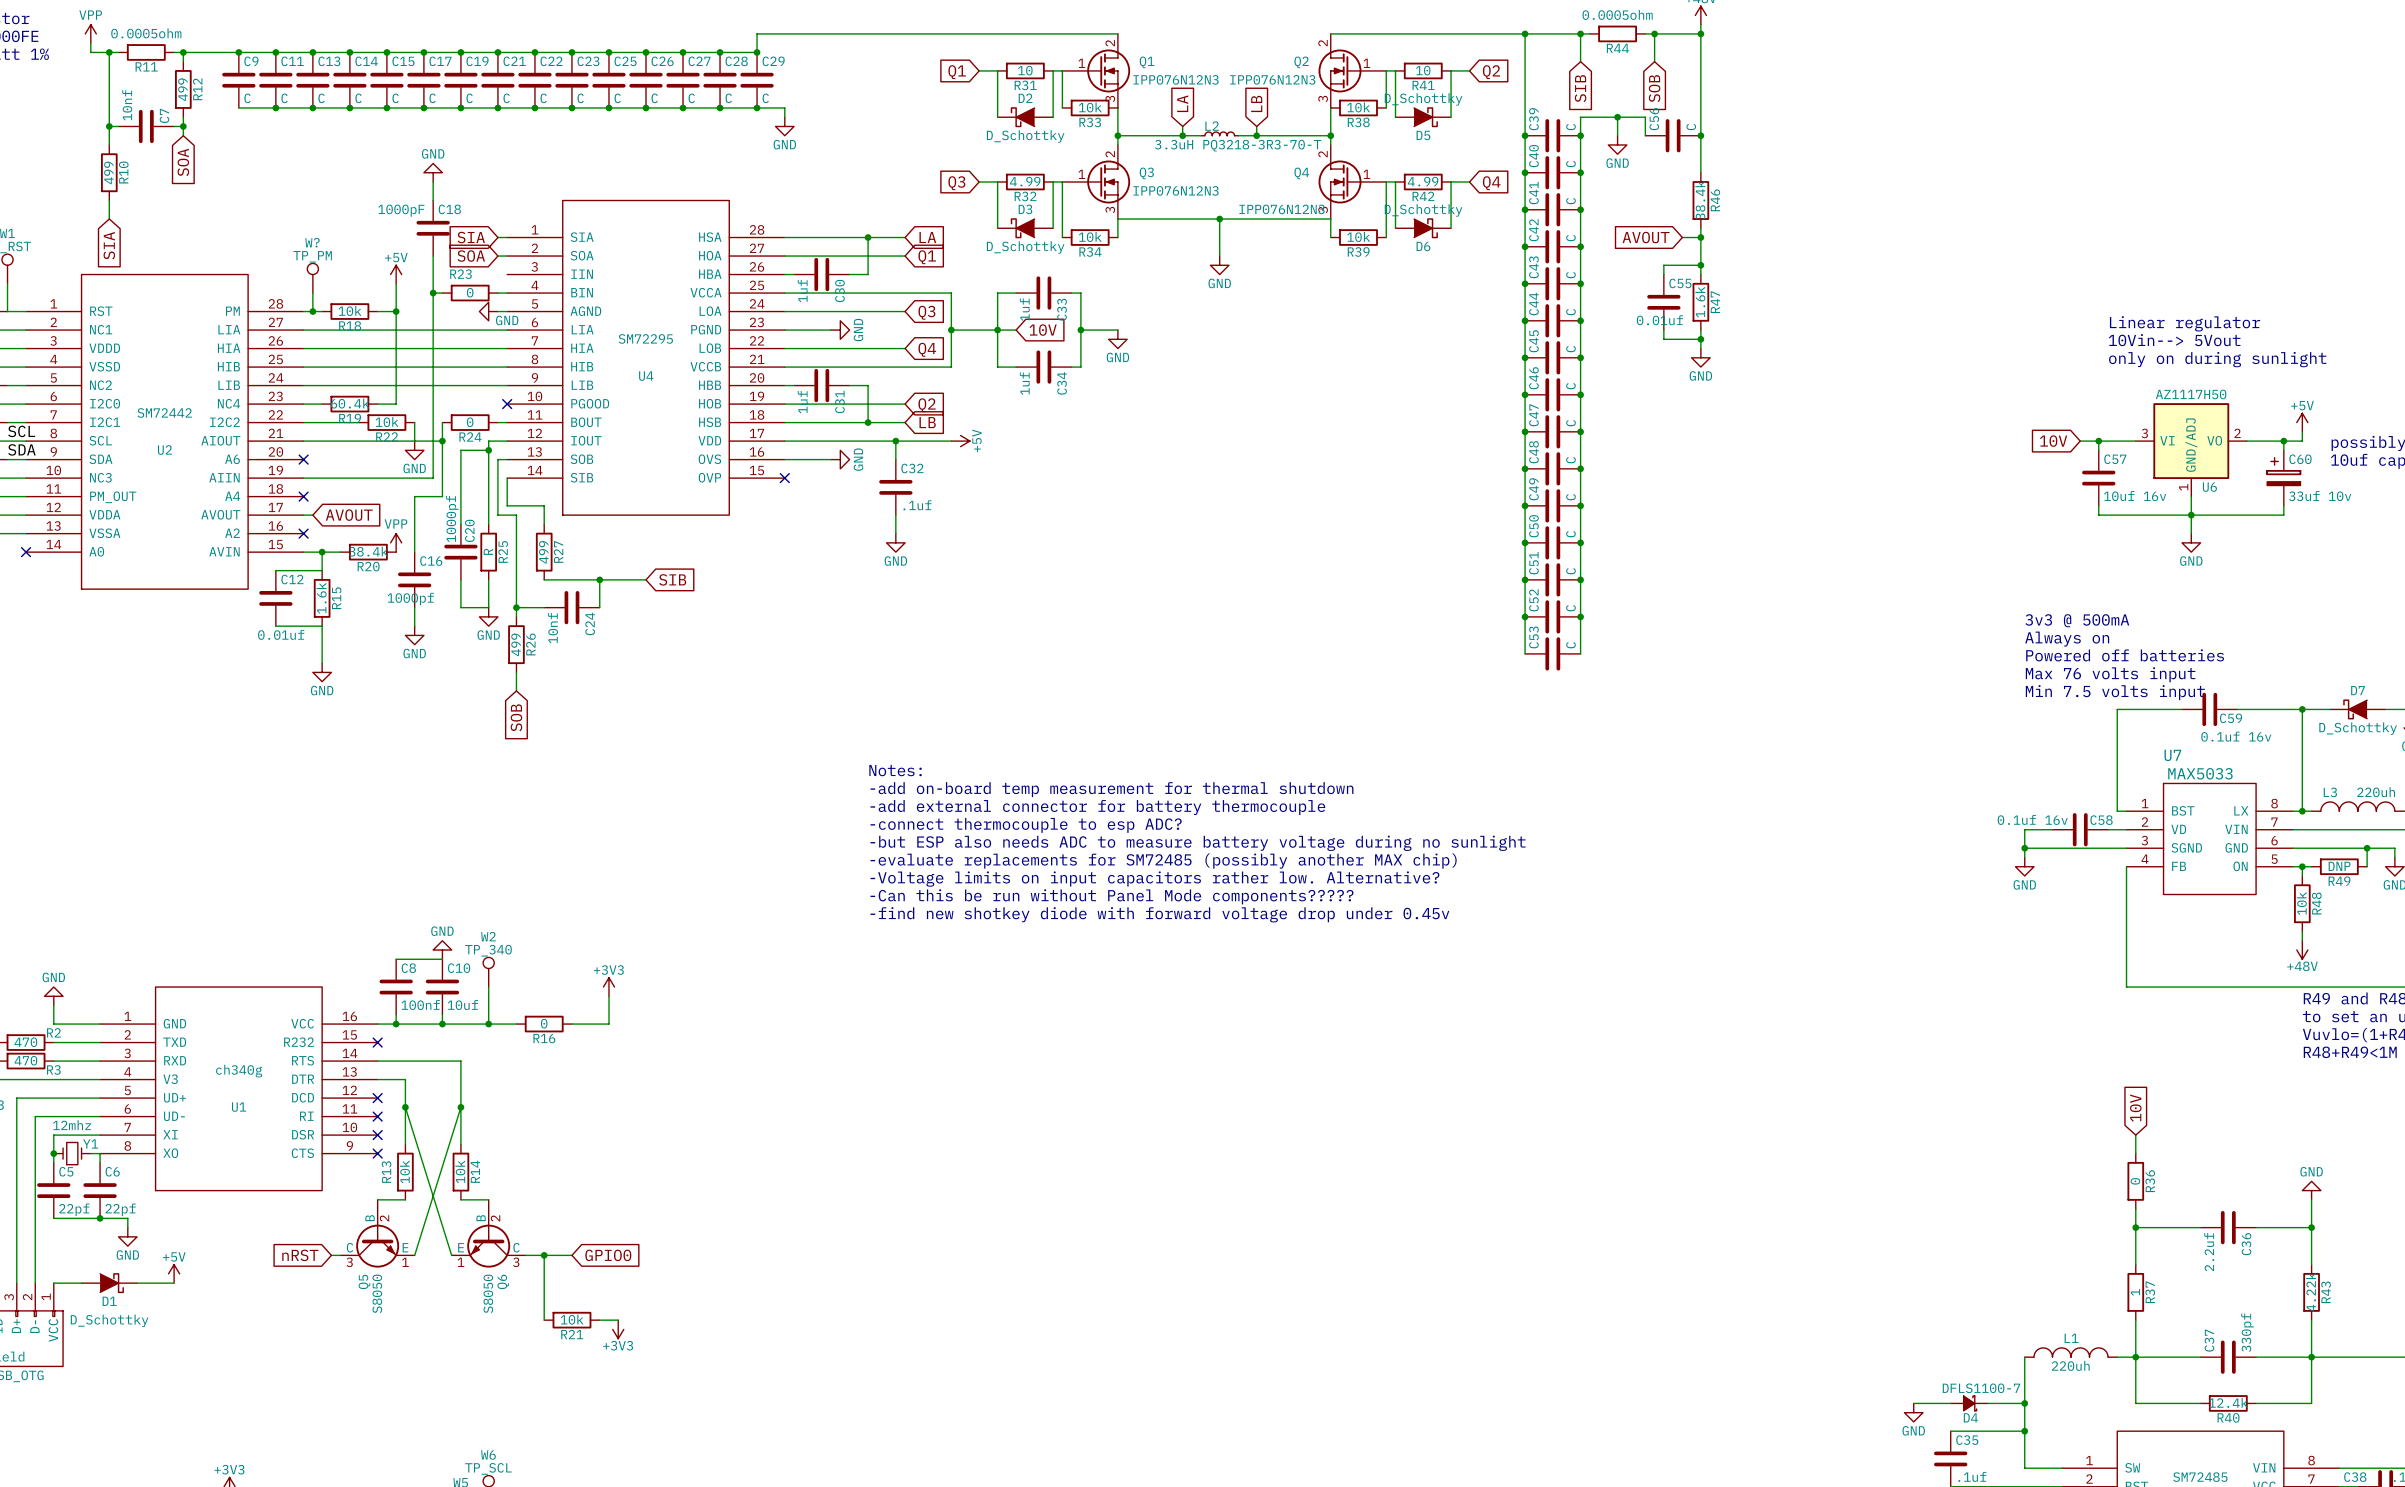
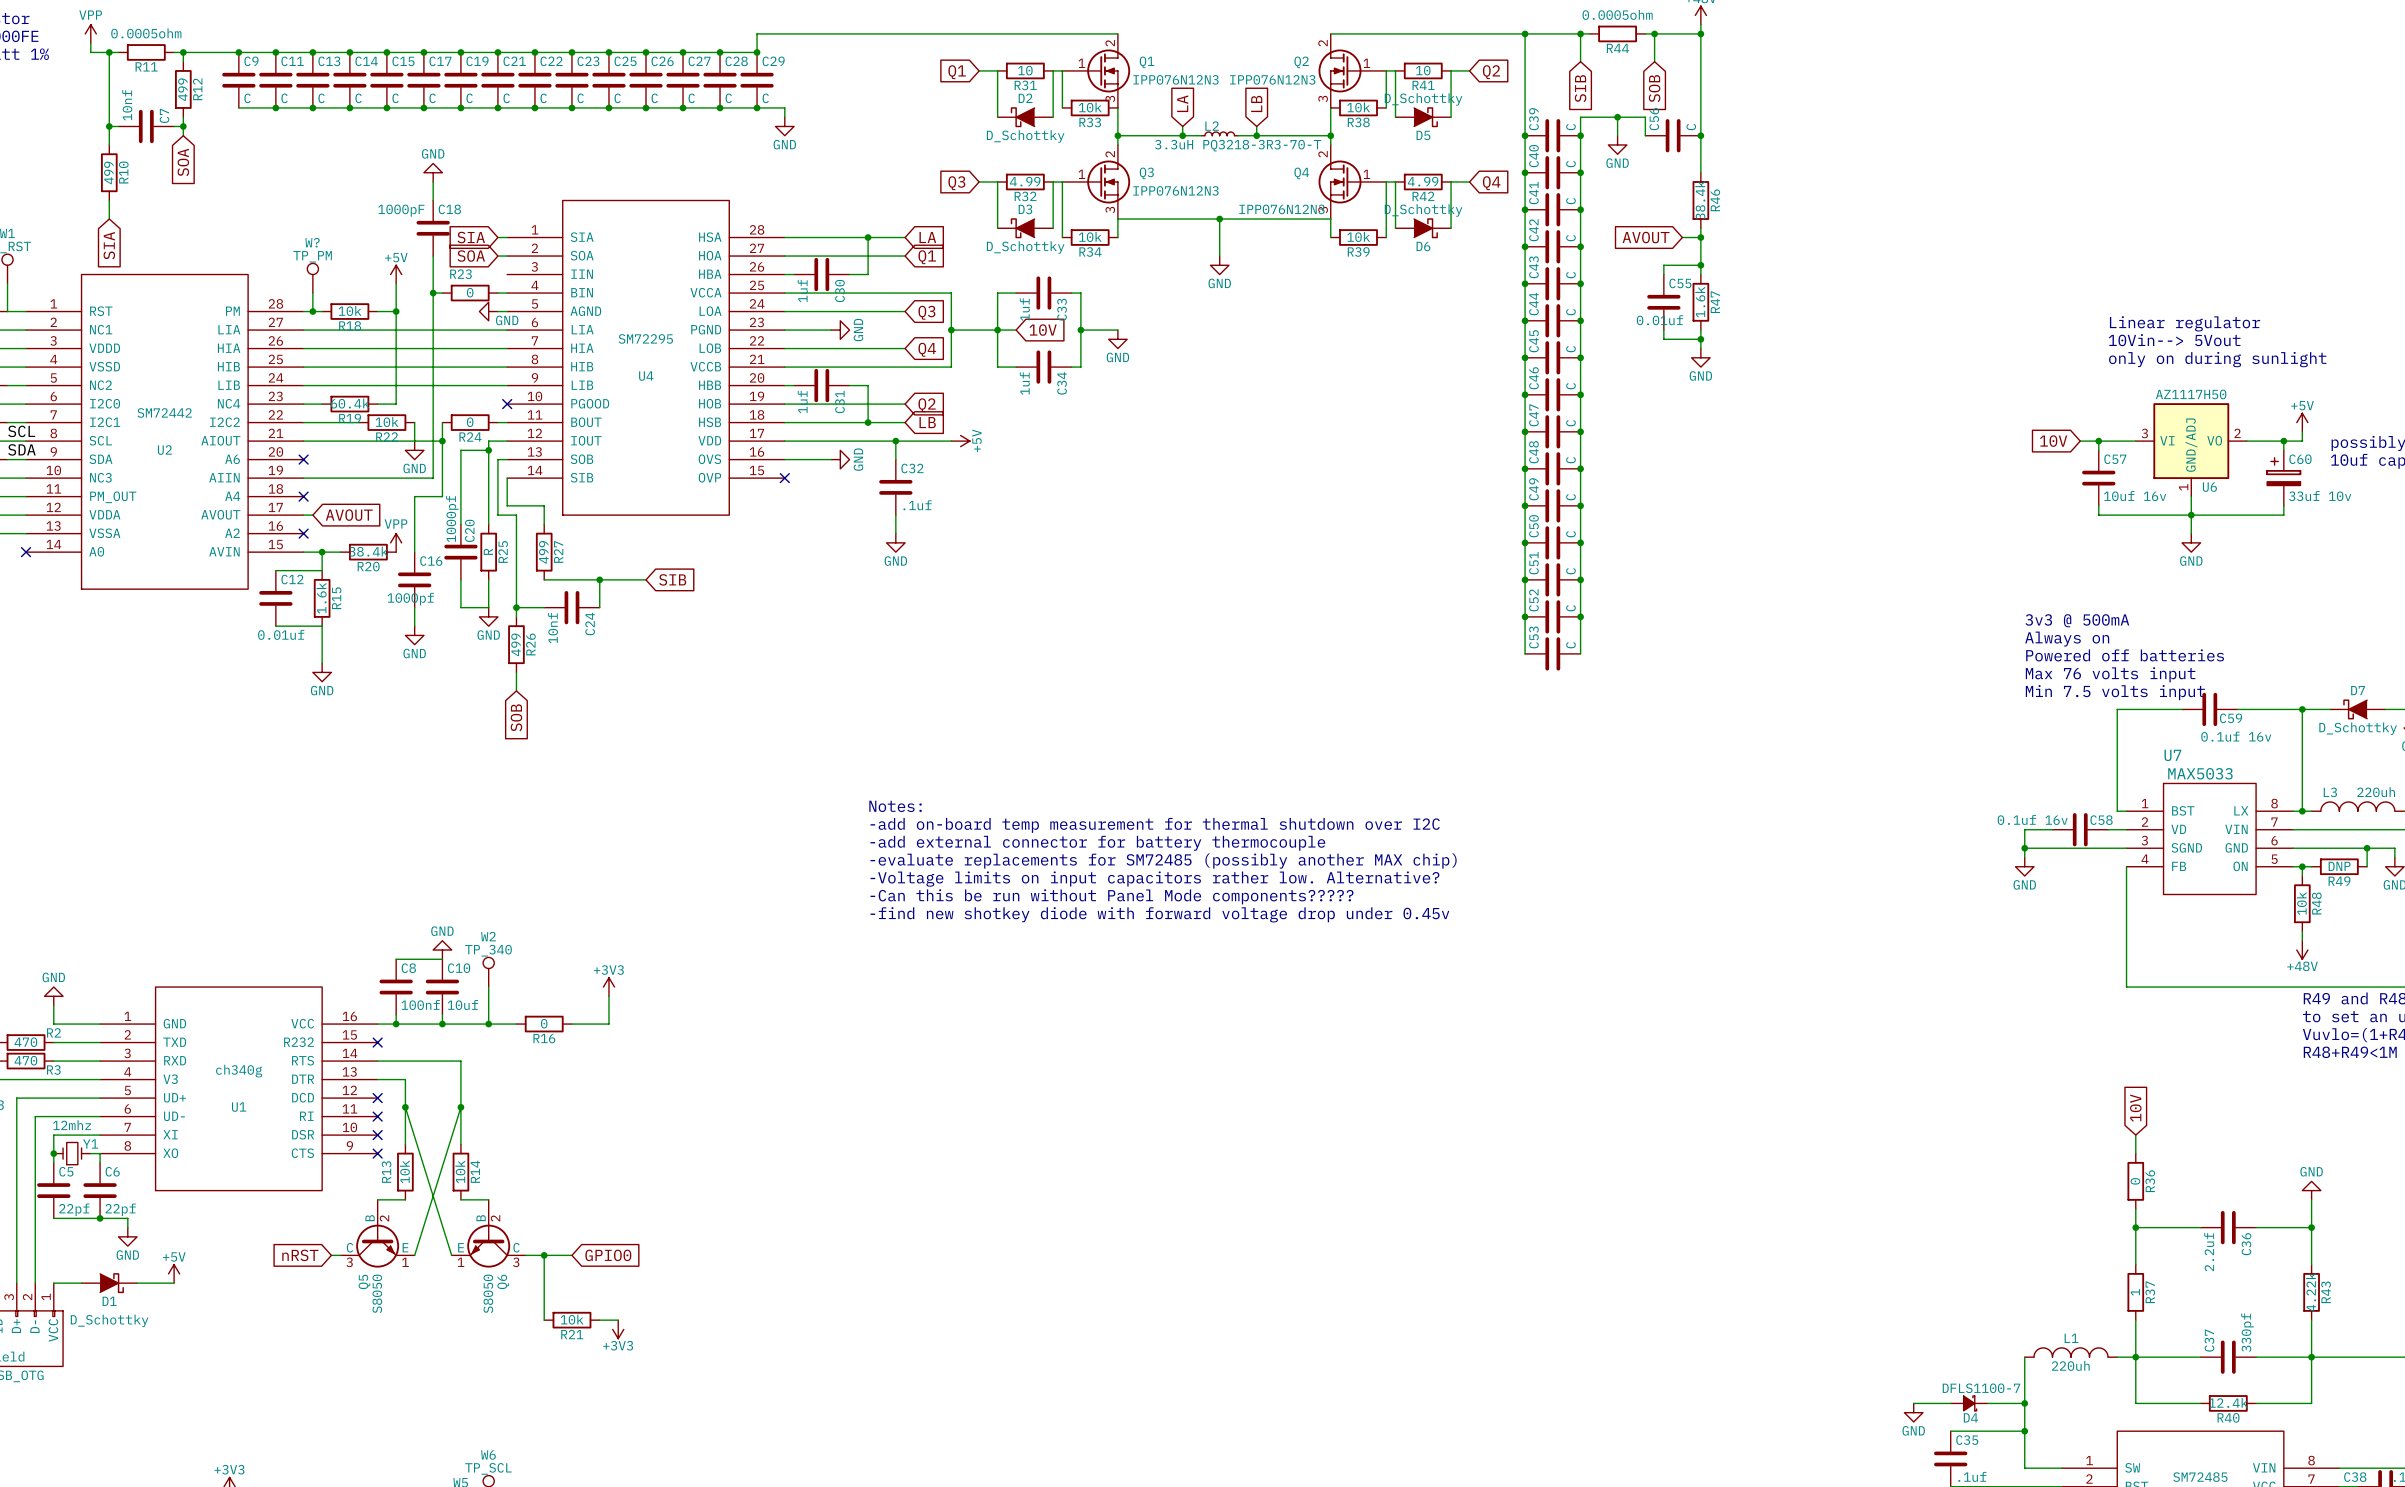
text: Notes: (895, 770) -> none
text: -add on-board temp measurement for thermal shutdown (1111, 789) -> none
text: -add external connector for battery thermocouple (1097, 807) -> Notes: (895, 806)
text: -connect thermocouple to esp ADC? (1026, 825) -> -add on-board temp measurement for thermal shutdown over I2C (1155, 825)
text: -but ESP also needs ADC to measure battery voltage during no sunlight (1198, 843) -> -add external connector for battery thermocouple (1097, 843)

